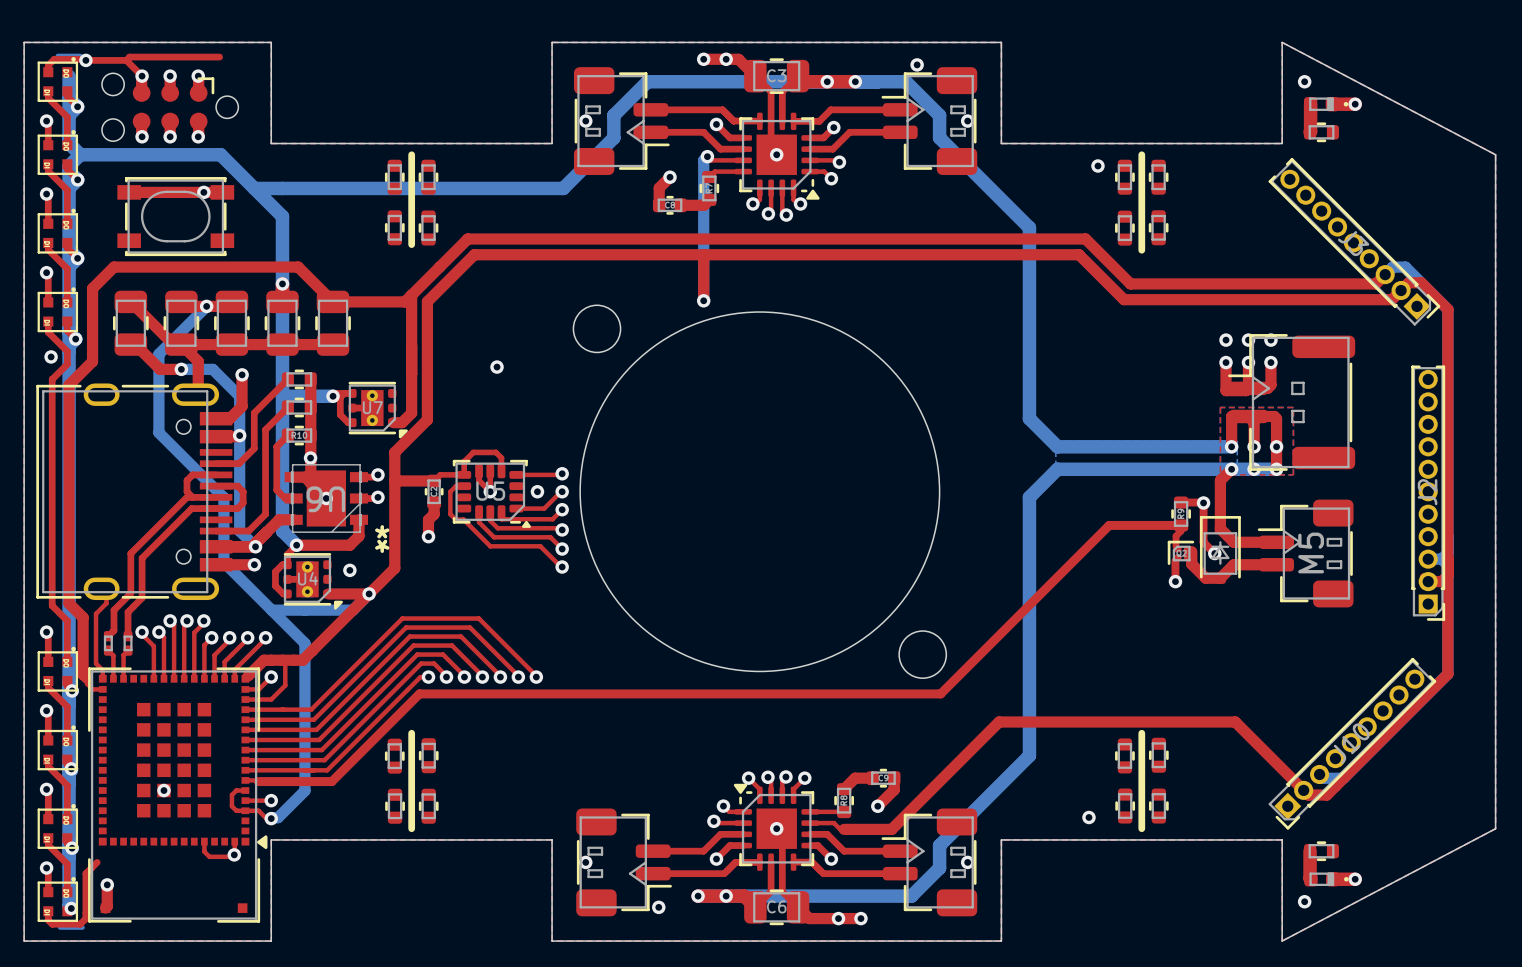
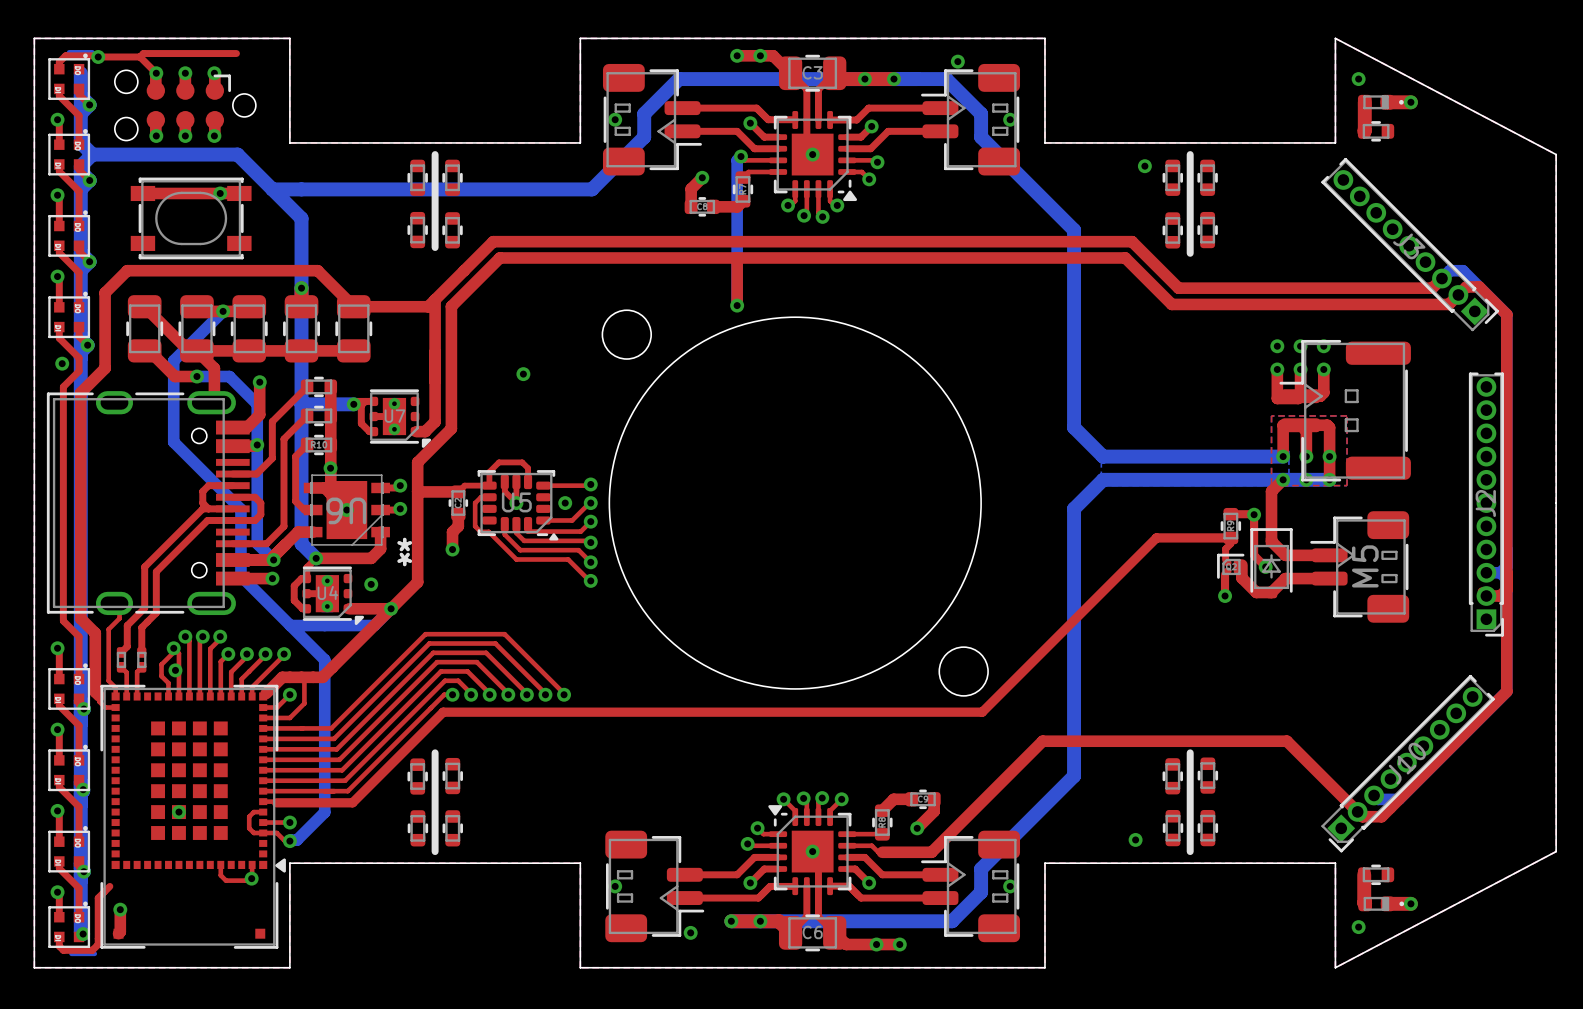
top track: (142, 632) (153, 646) (153, 665) -> (175, 651) (161, 664) (161, 676) (168, 683)
via position: (142, 632) -> (175, 670)

